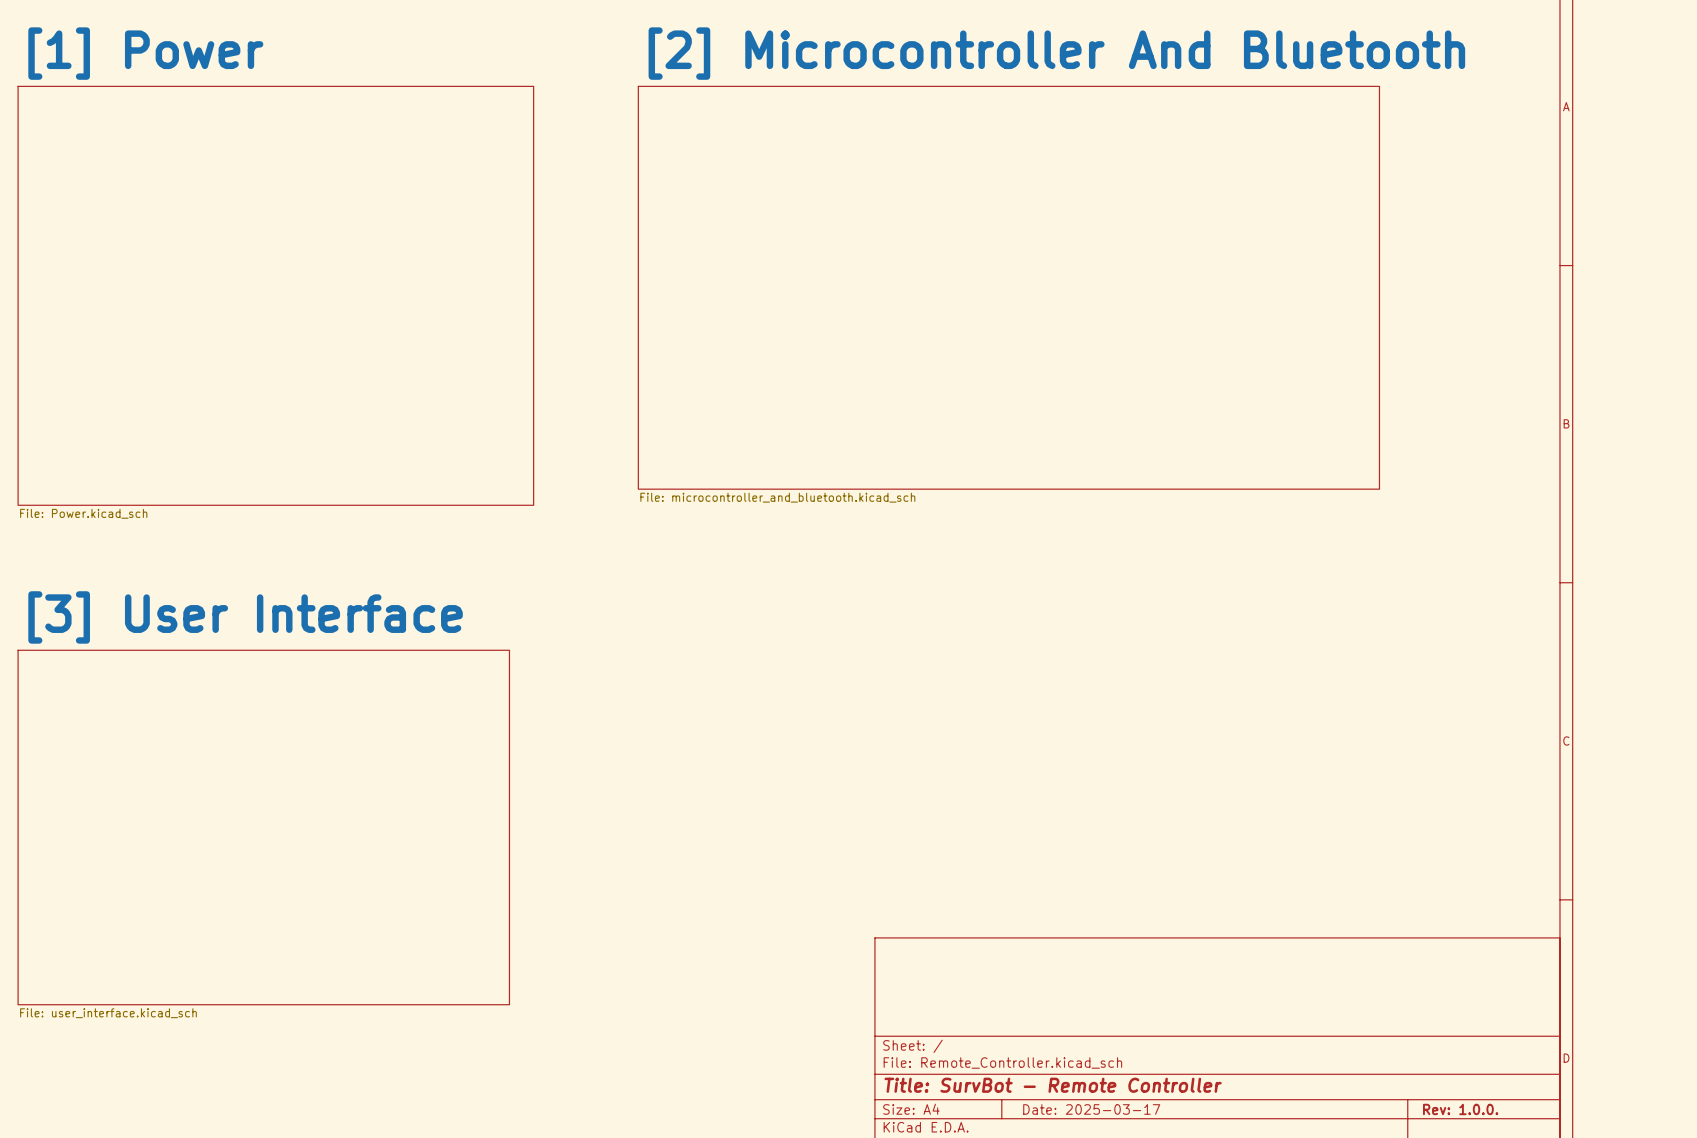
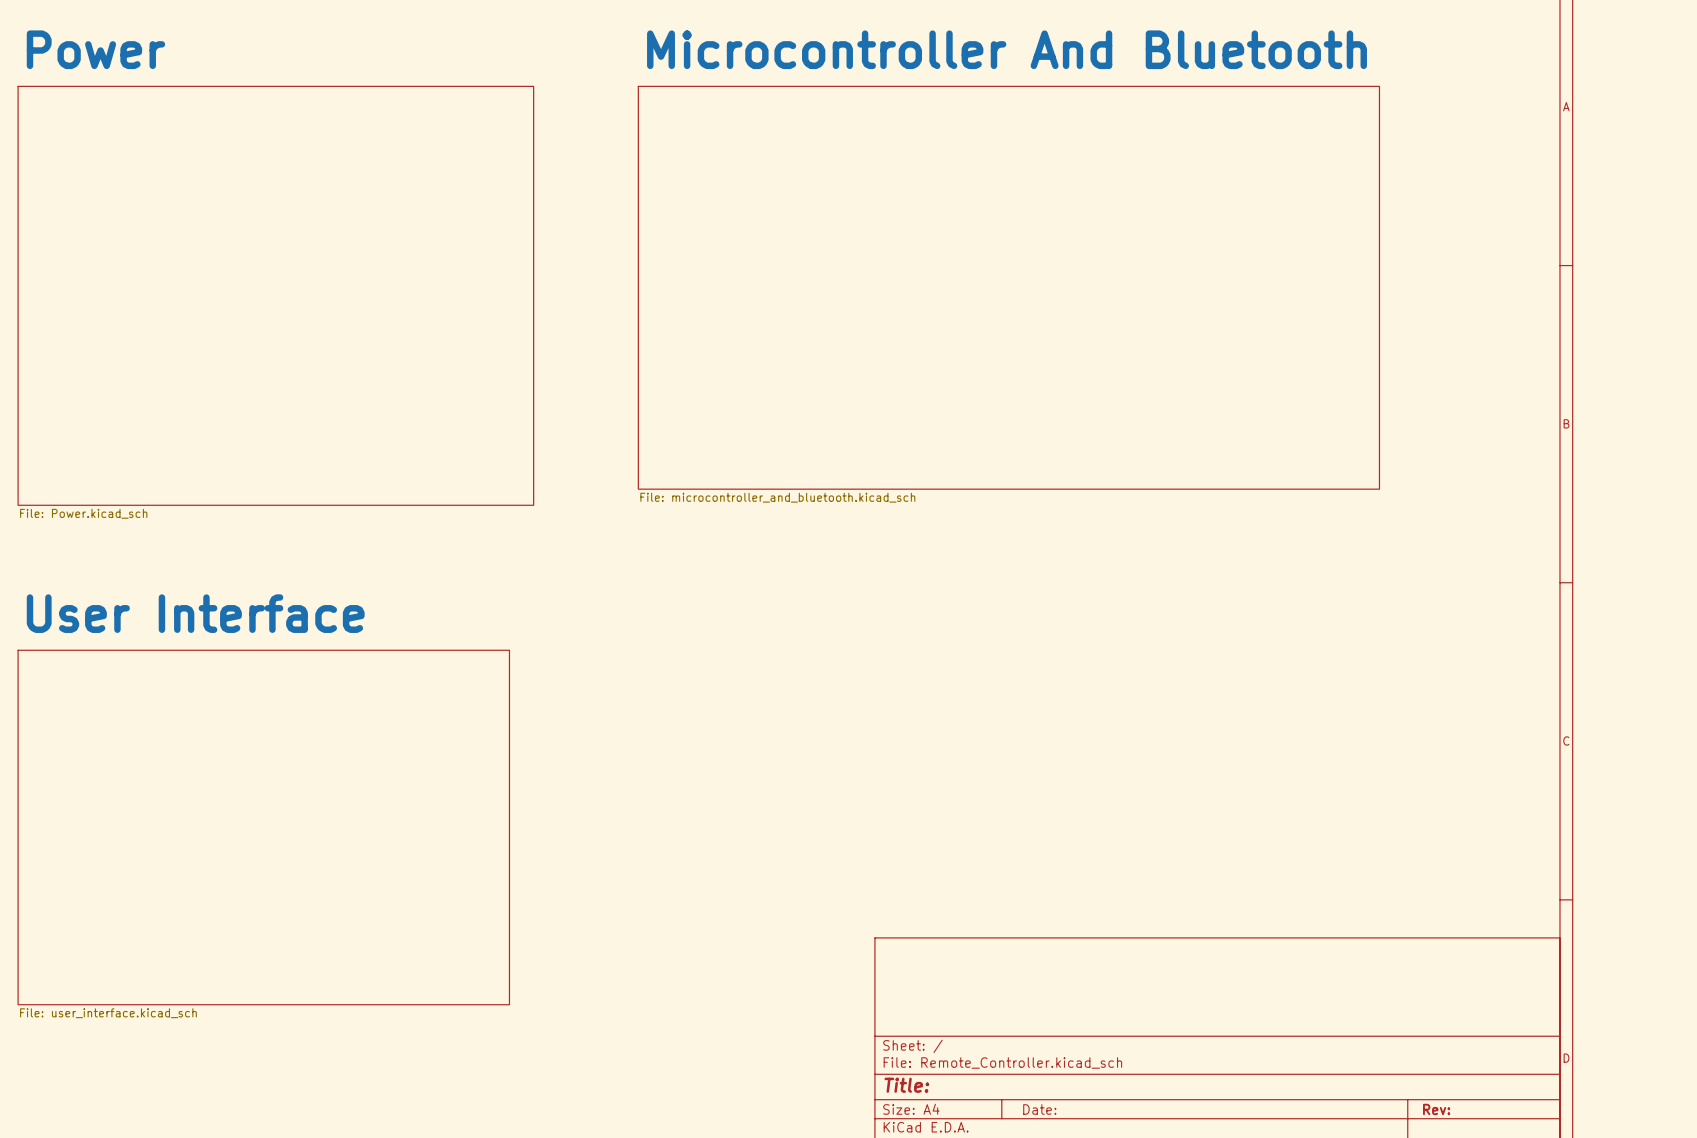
sheet [1] Power name: [1] Power (145, 53) -> Power (95, 49)
sheet [2] Microcontroller And Bluetooth name: [2] Microcontroller And Bluetooth (1056, 53) -> Microcontroller And Bluetooth (1007, 49)
sheet [3] User Interface name: [3] User Interface (245, 617) -> User Interface (195, 613)
title block: Title: SurvBot - Remote Controller (1053, 1085) -> Title: (906, 1085)
title block: Date: 2025-03-17 (1091, 1109) -> Date: (1039, 1109)
title block: Rev: 1.0.0. (1460, 1109) -> Rev: (1436, 1109)

